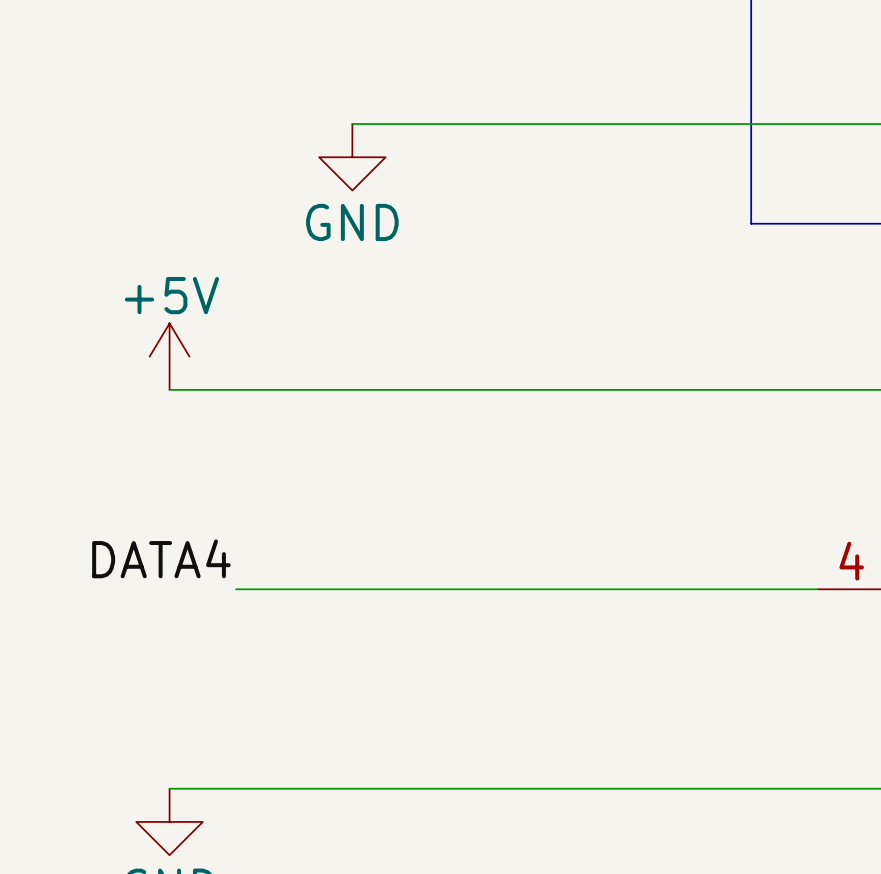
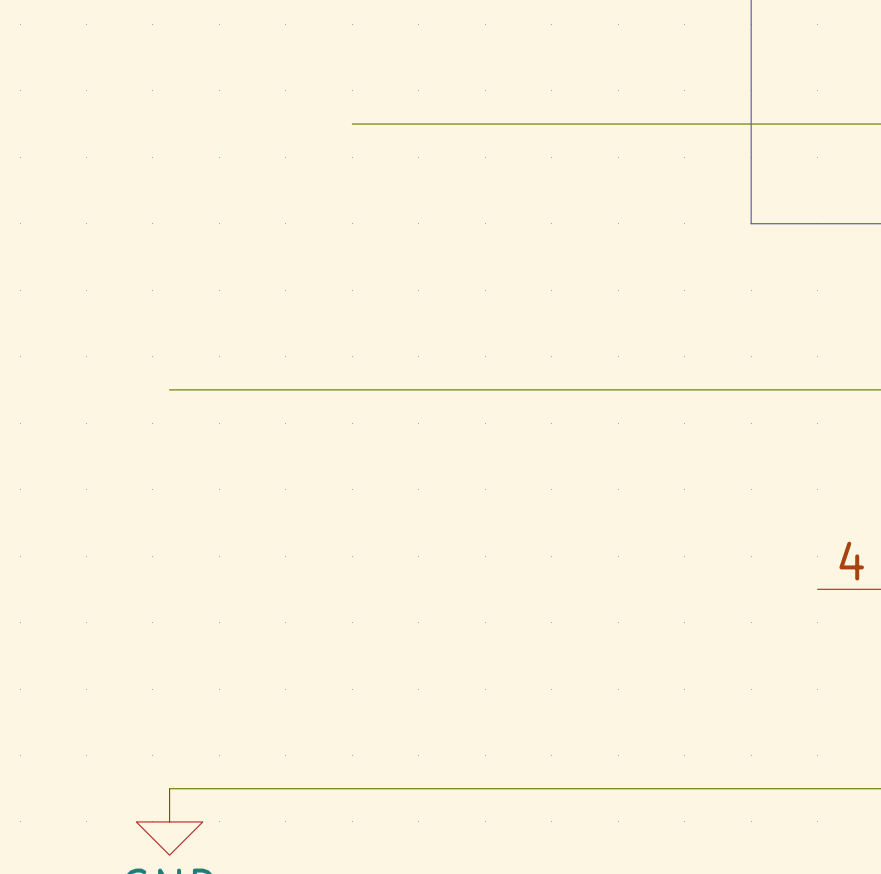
power symbol: GND (352, 157) -> none
power symbol: +5V (169, 356) -> none
label: DATA4 (161, 558) -> none
wire: (236, 589) (817, 589) -> none

